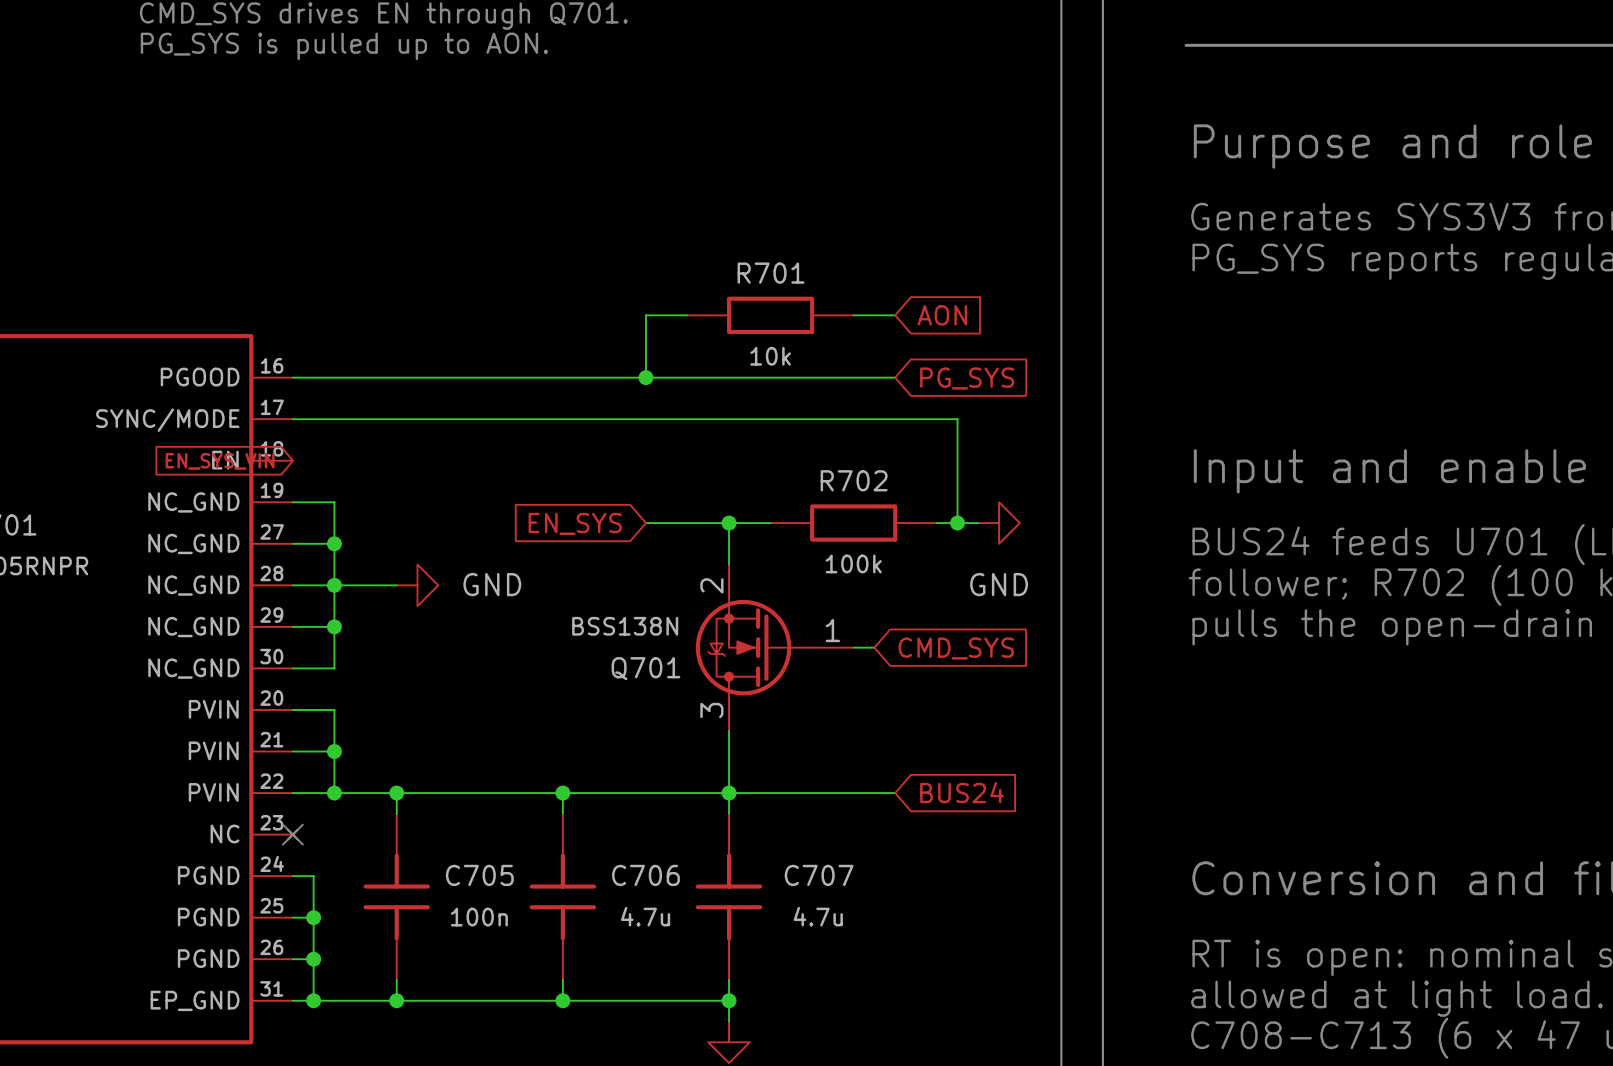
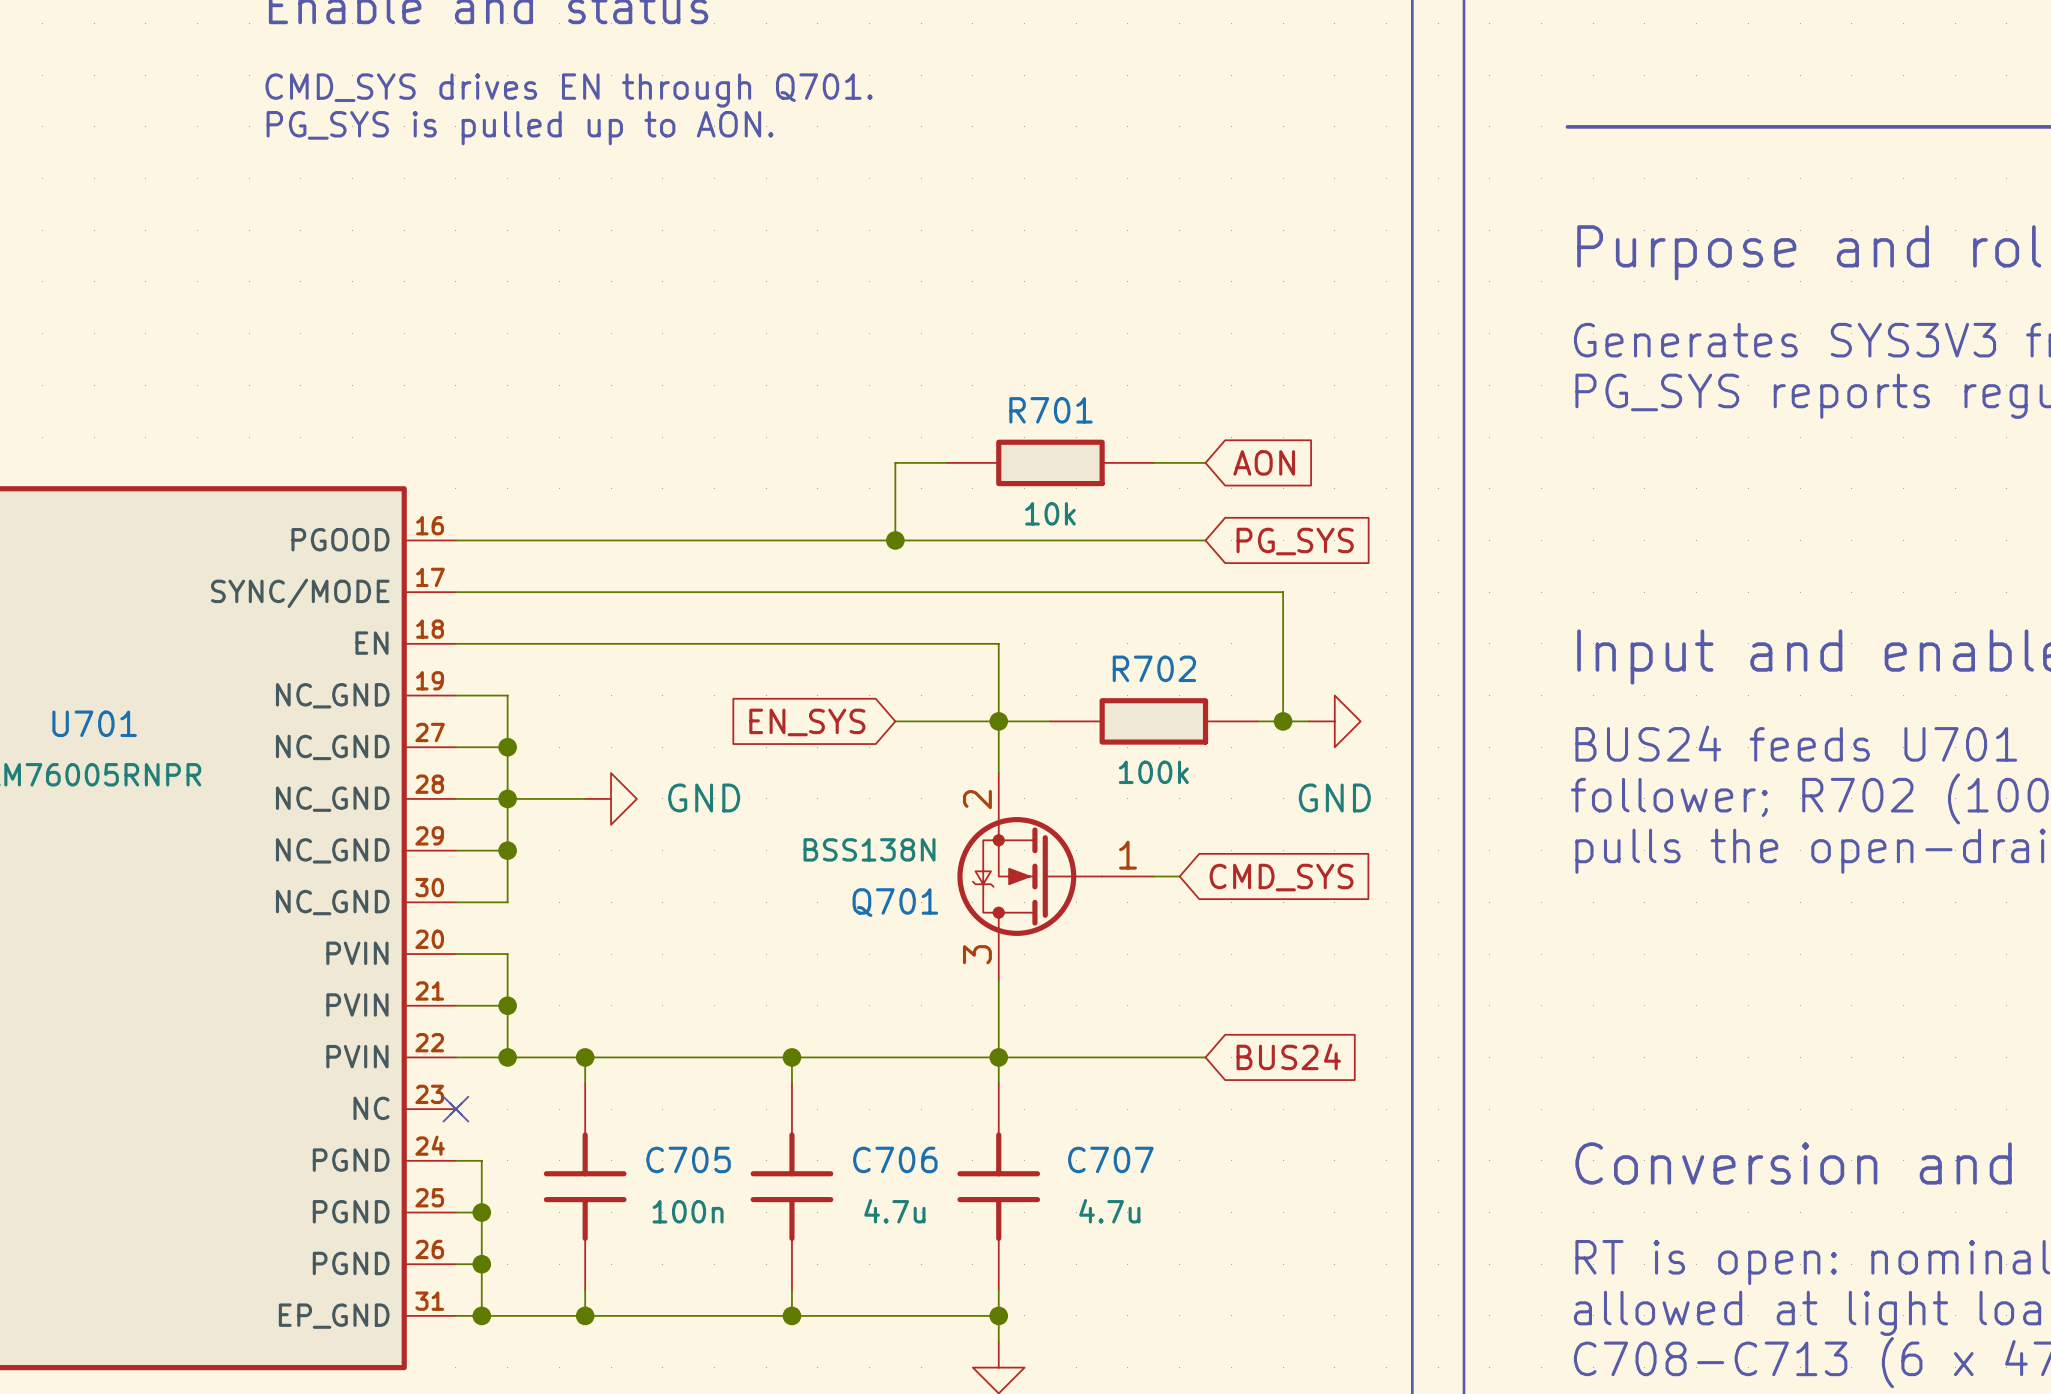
wire: none -> (455, 643) (998, 643) (998, 721)
global label: EN_SYS_VIN (220, 461) -> none

